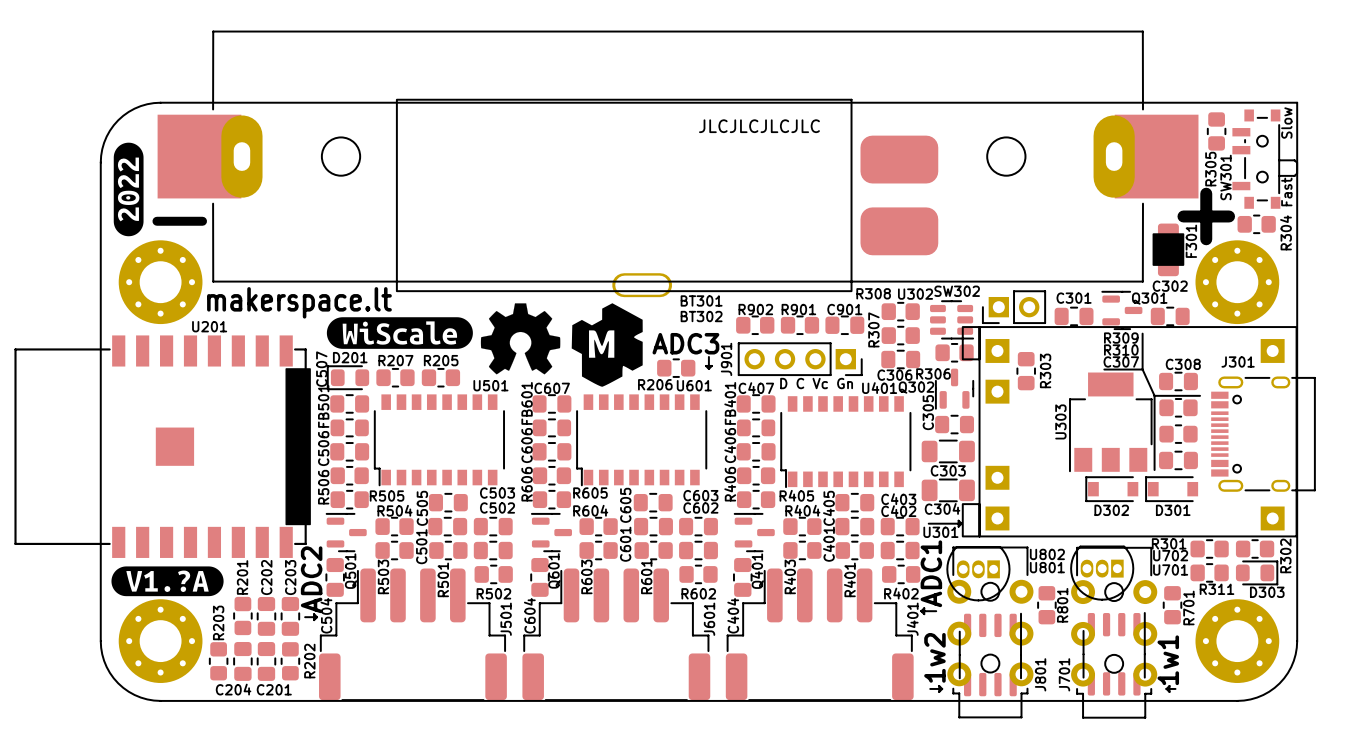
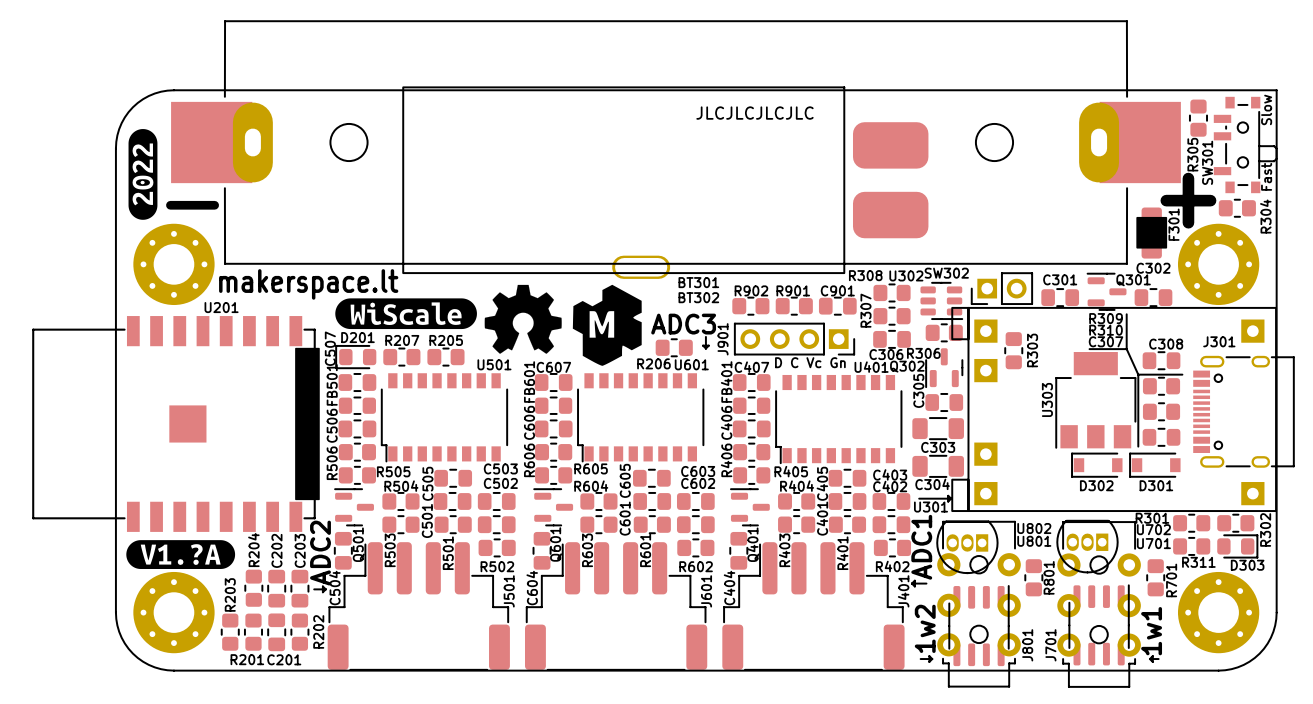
R201 name: R201 (242, 577) -> R204 (253, 550)
C204: (242, 661) -> none
R201: none -> (253, 632)

